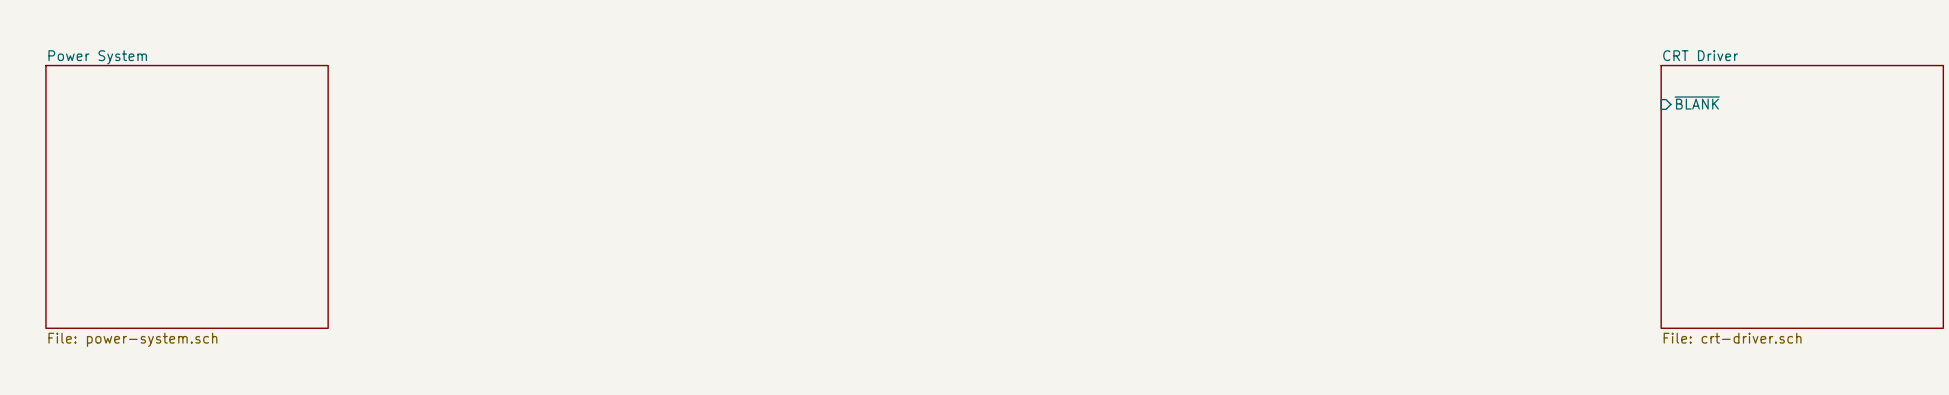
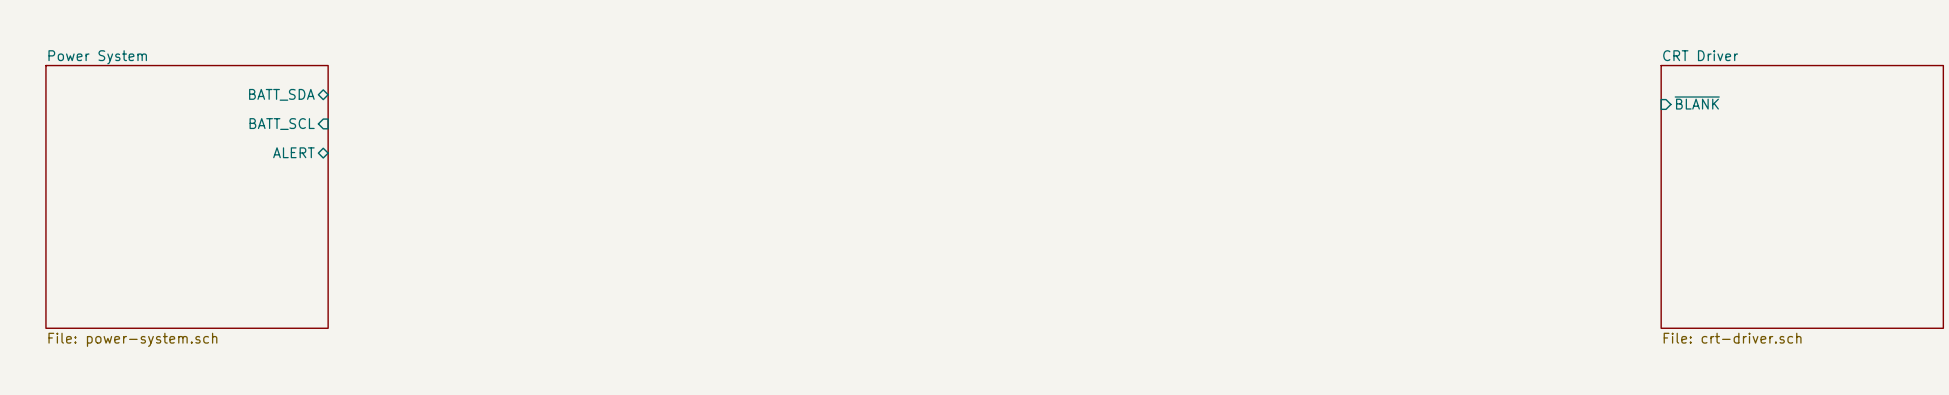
sheet pin: none -> BATT_SDA (281, 94)
sheet pin: none -> BATT_SCL (282, 124)
sheet pin: none -> ALERT (293, 152)

